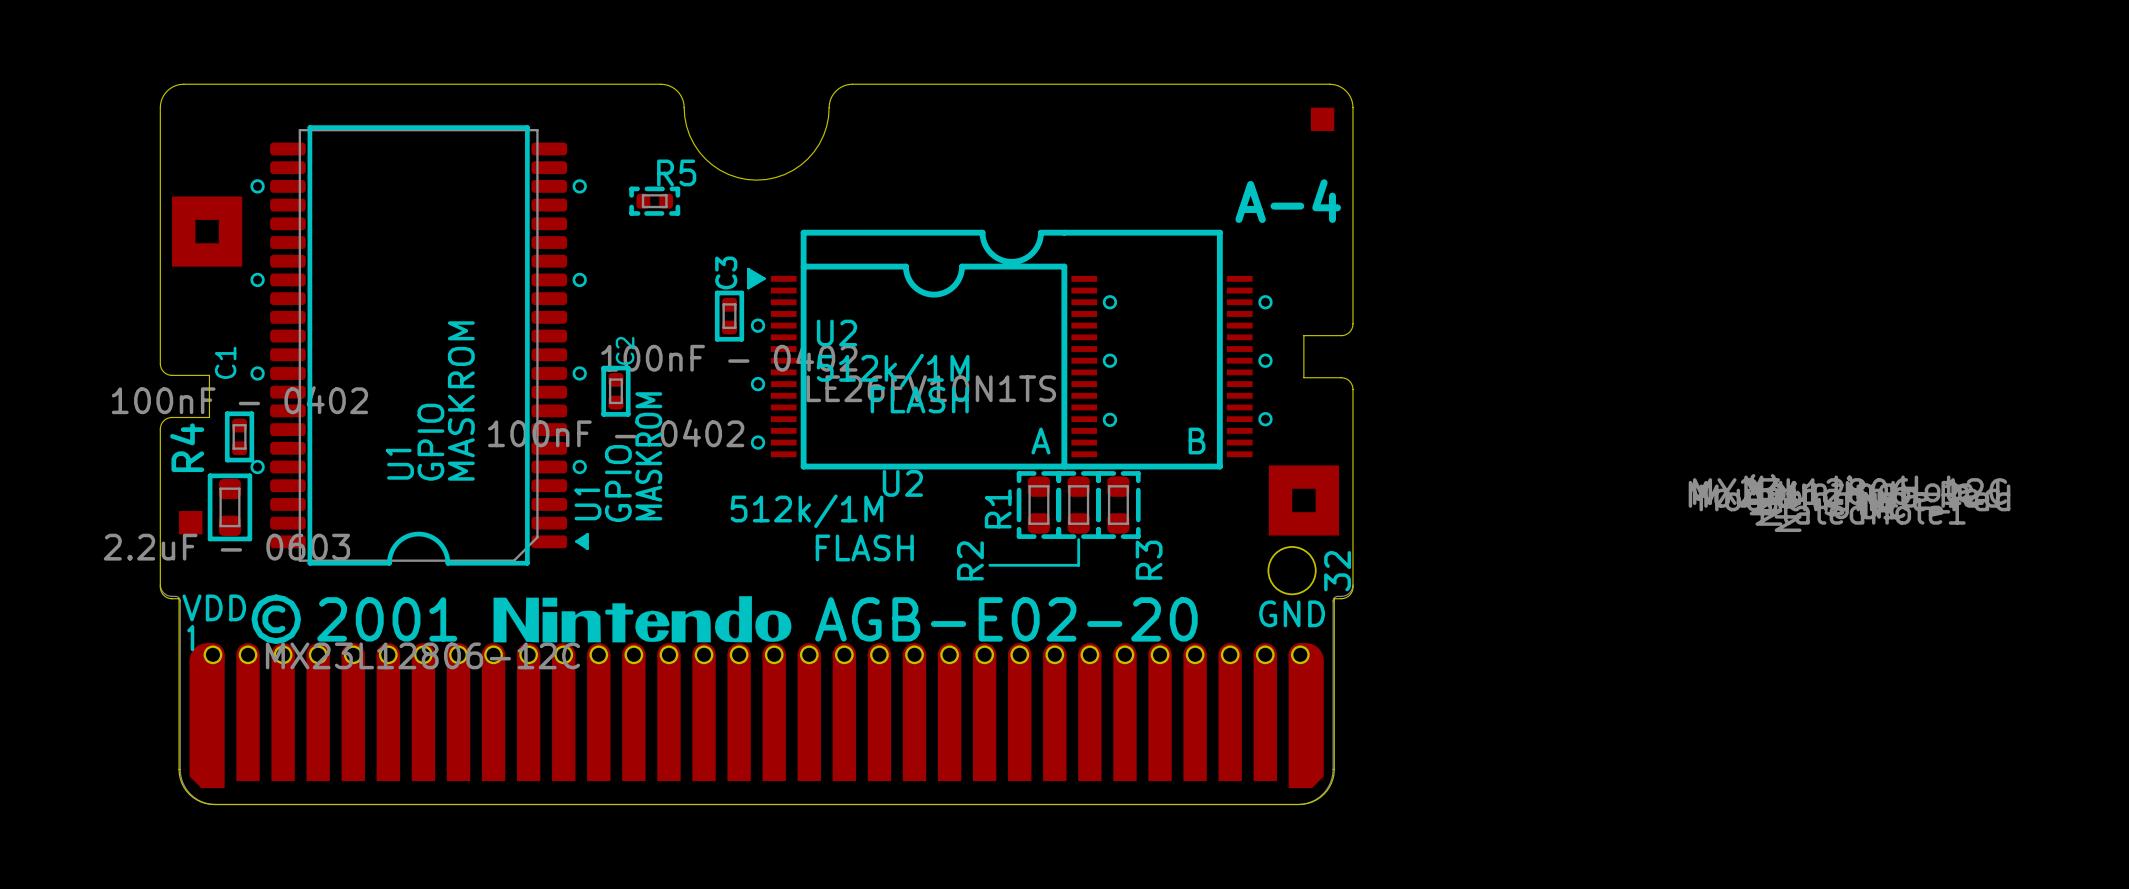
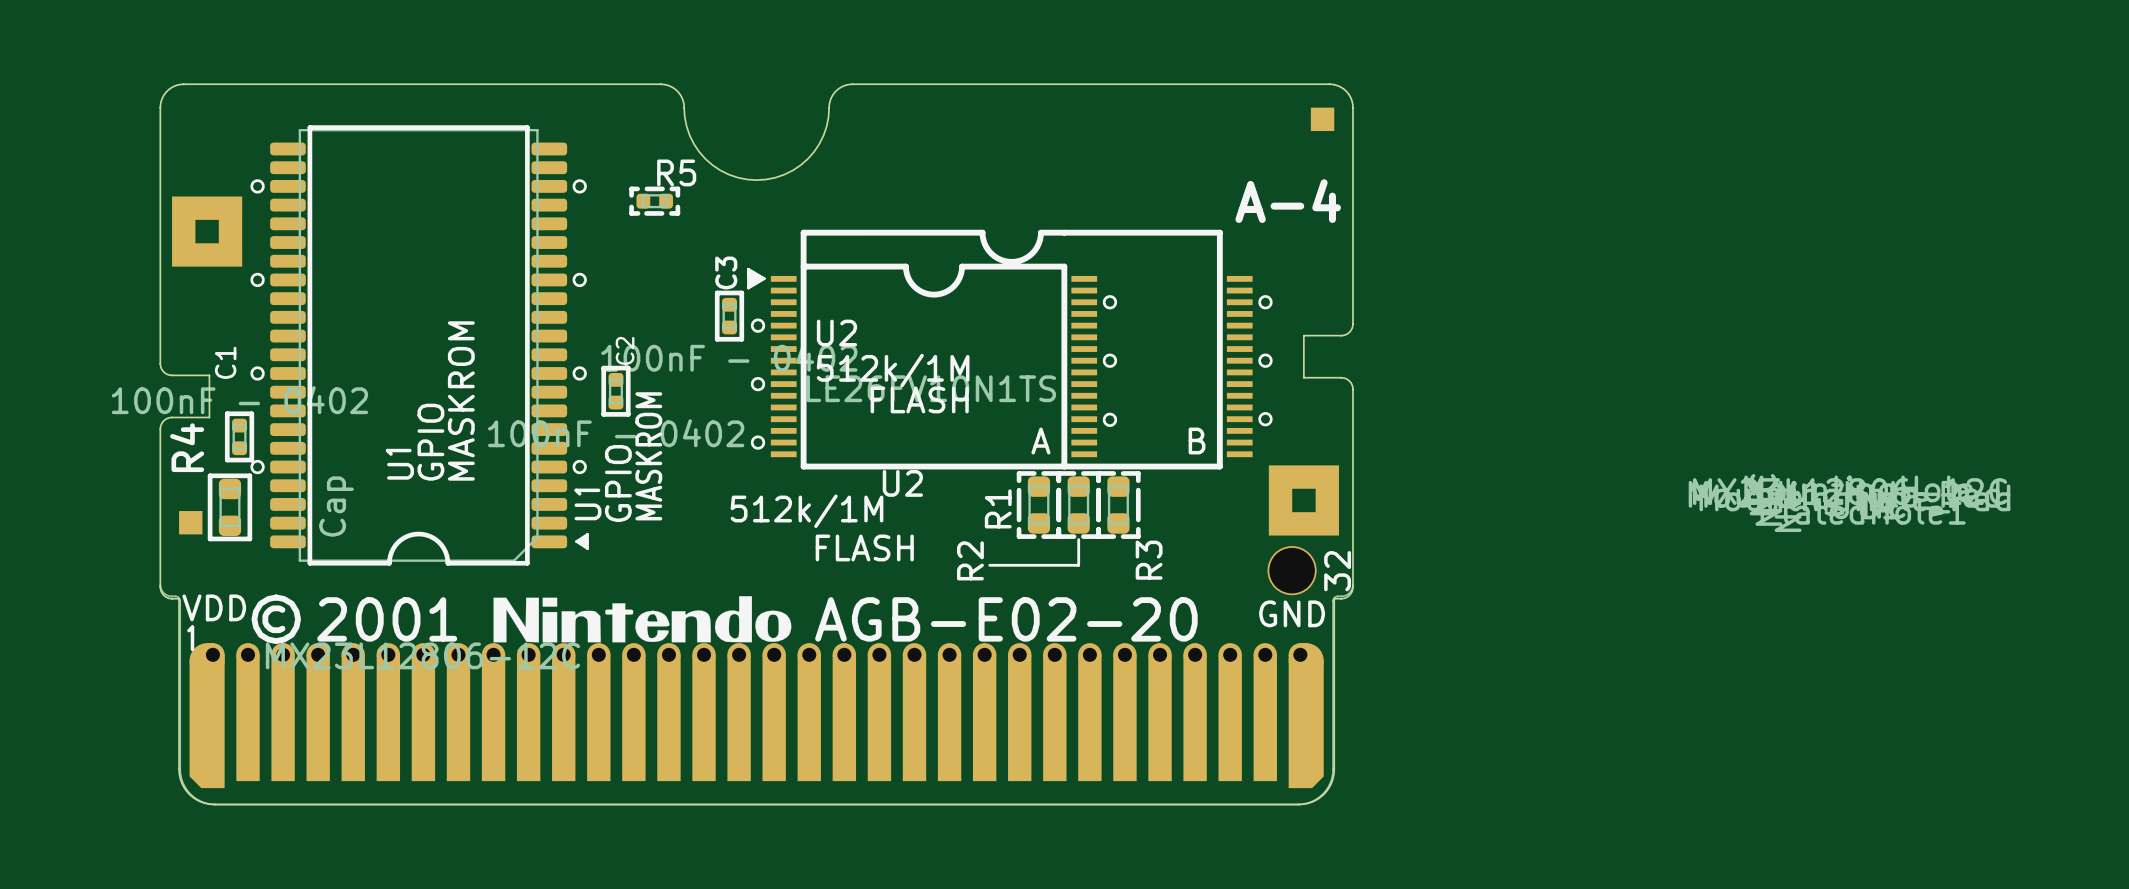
R4 value: 2.2uF - 0603 (226, 547) -> Cap (336, 506)

